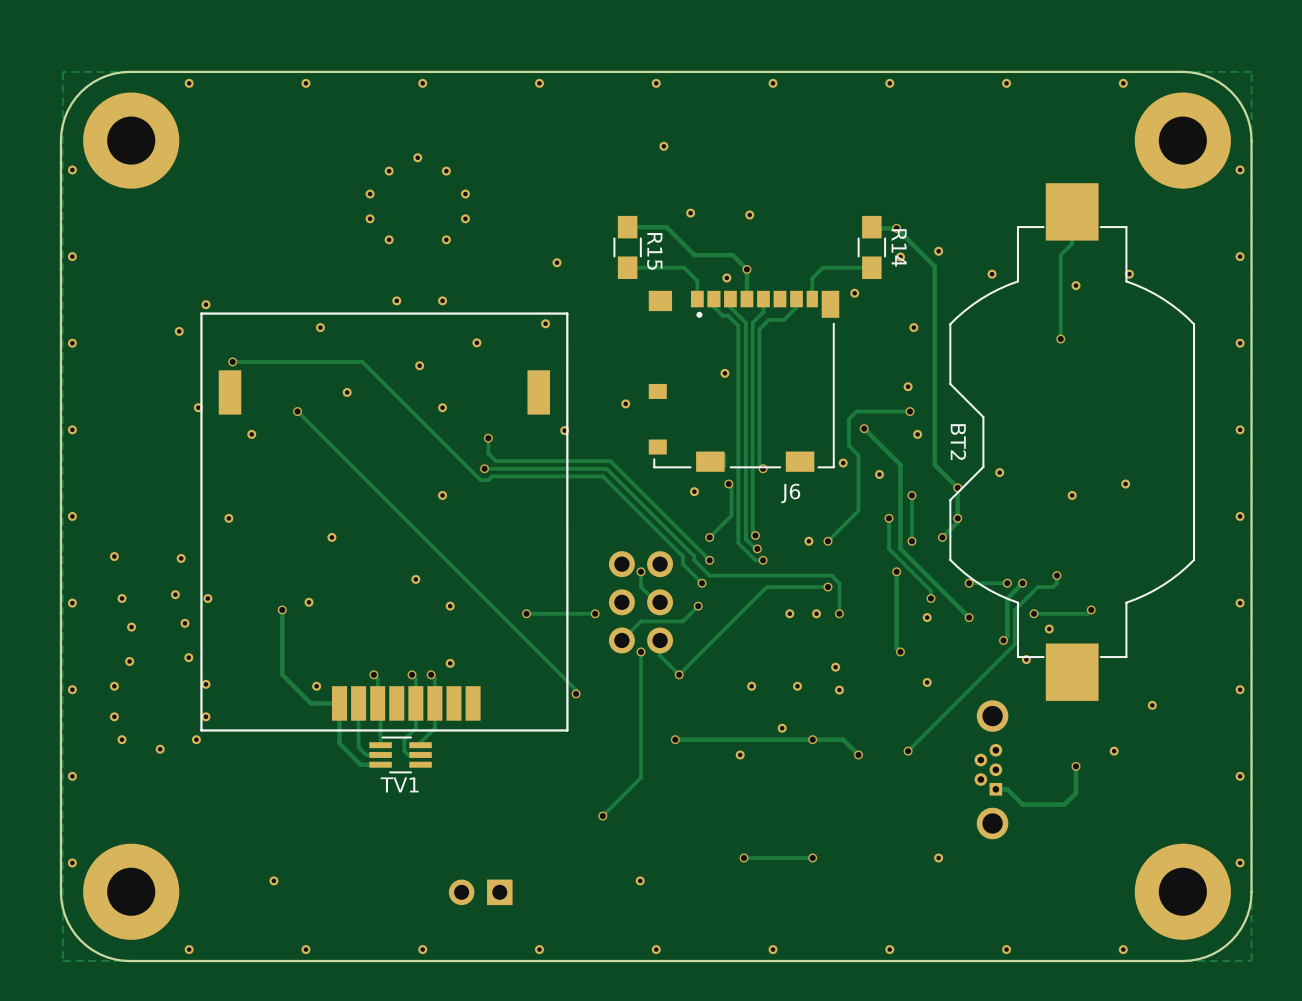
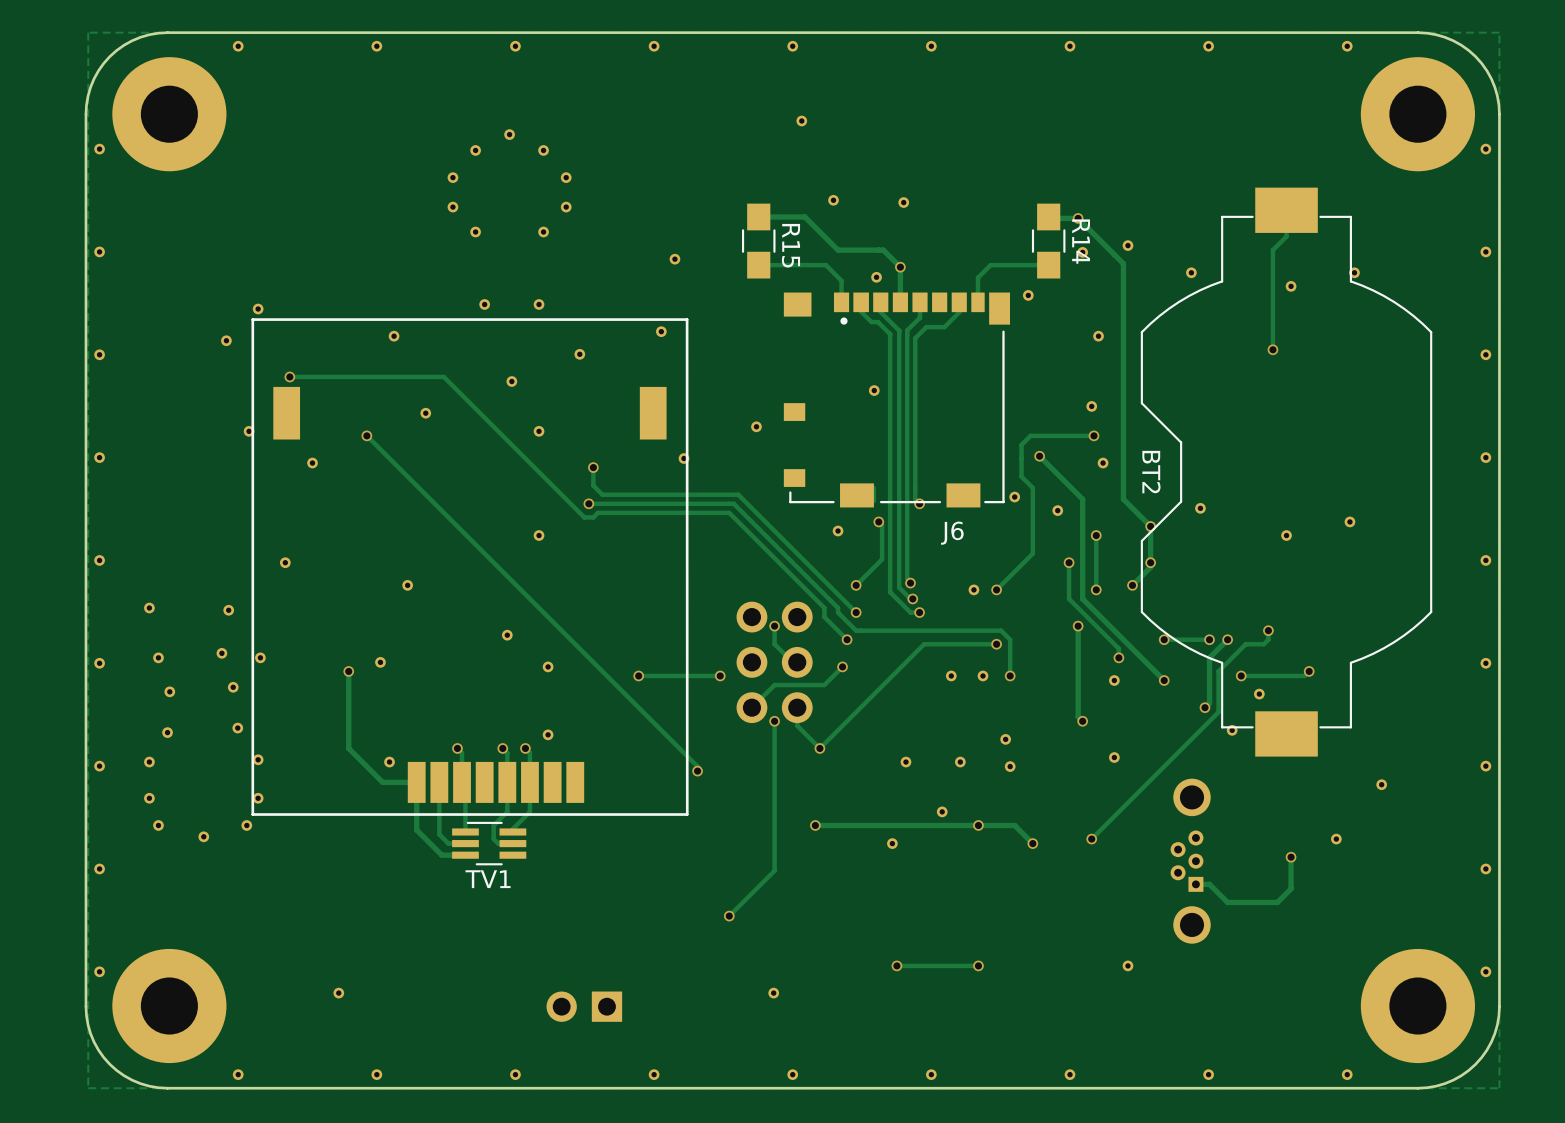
BT2 footprint: [949, 183, 1195, 701] -> [1140, 187, 1433, 757]

